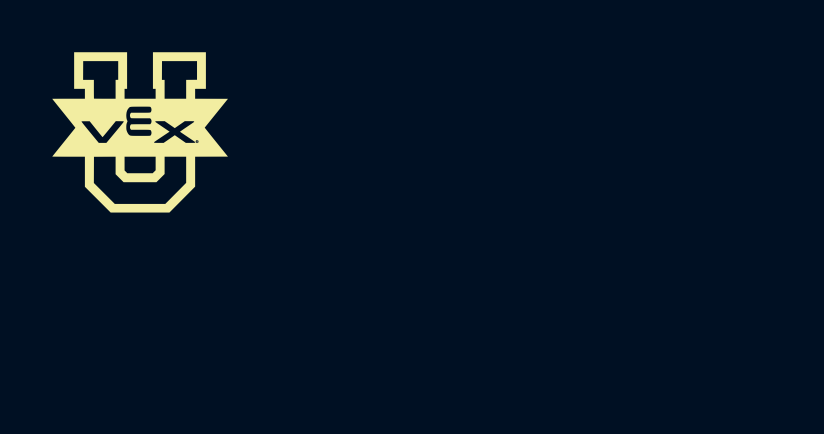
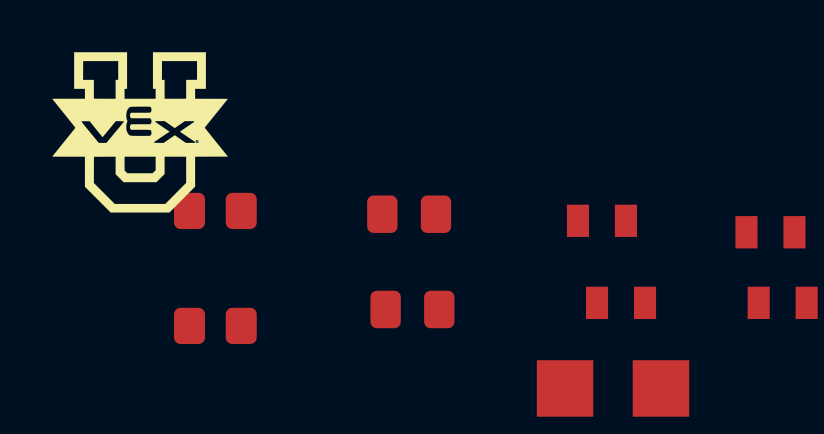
part: none -> (215, 210)
part: none -> (409, 214)
part: none -> (601, 220)
part: none -> (770, 232)
part: none -> (621, 302)
part: none -> (782, 302)
part: none -> (412, 309)
part: none -> (215, 325)
part: none -> (612, 388)

